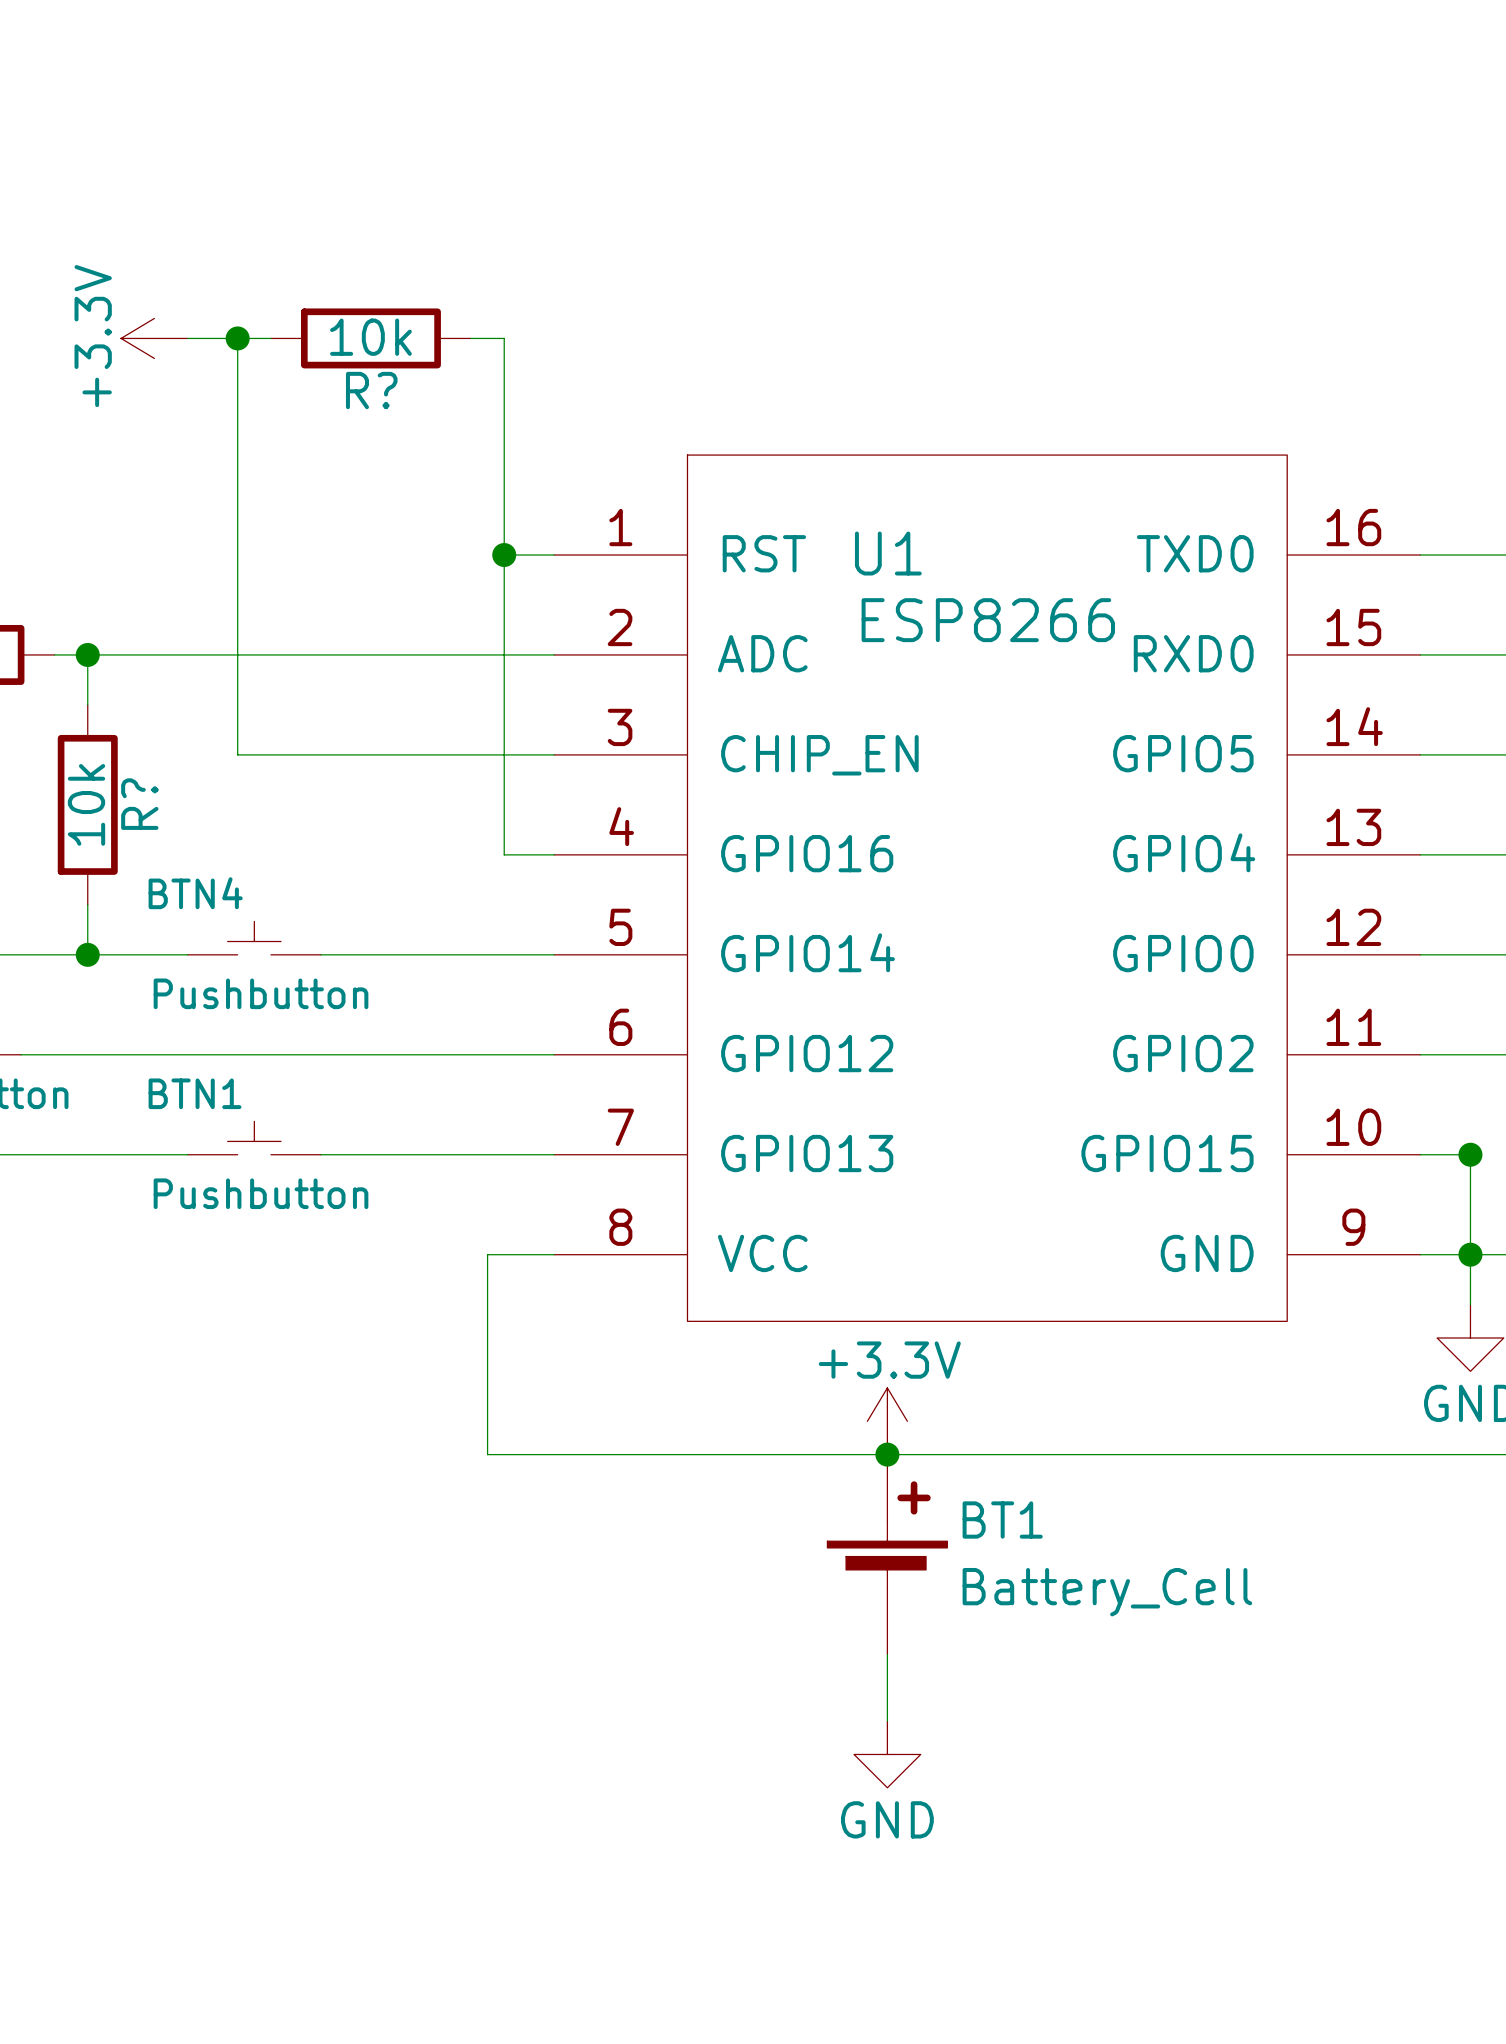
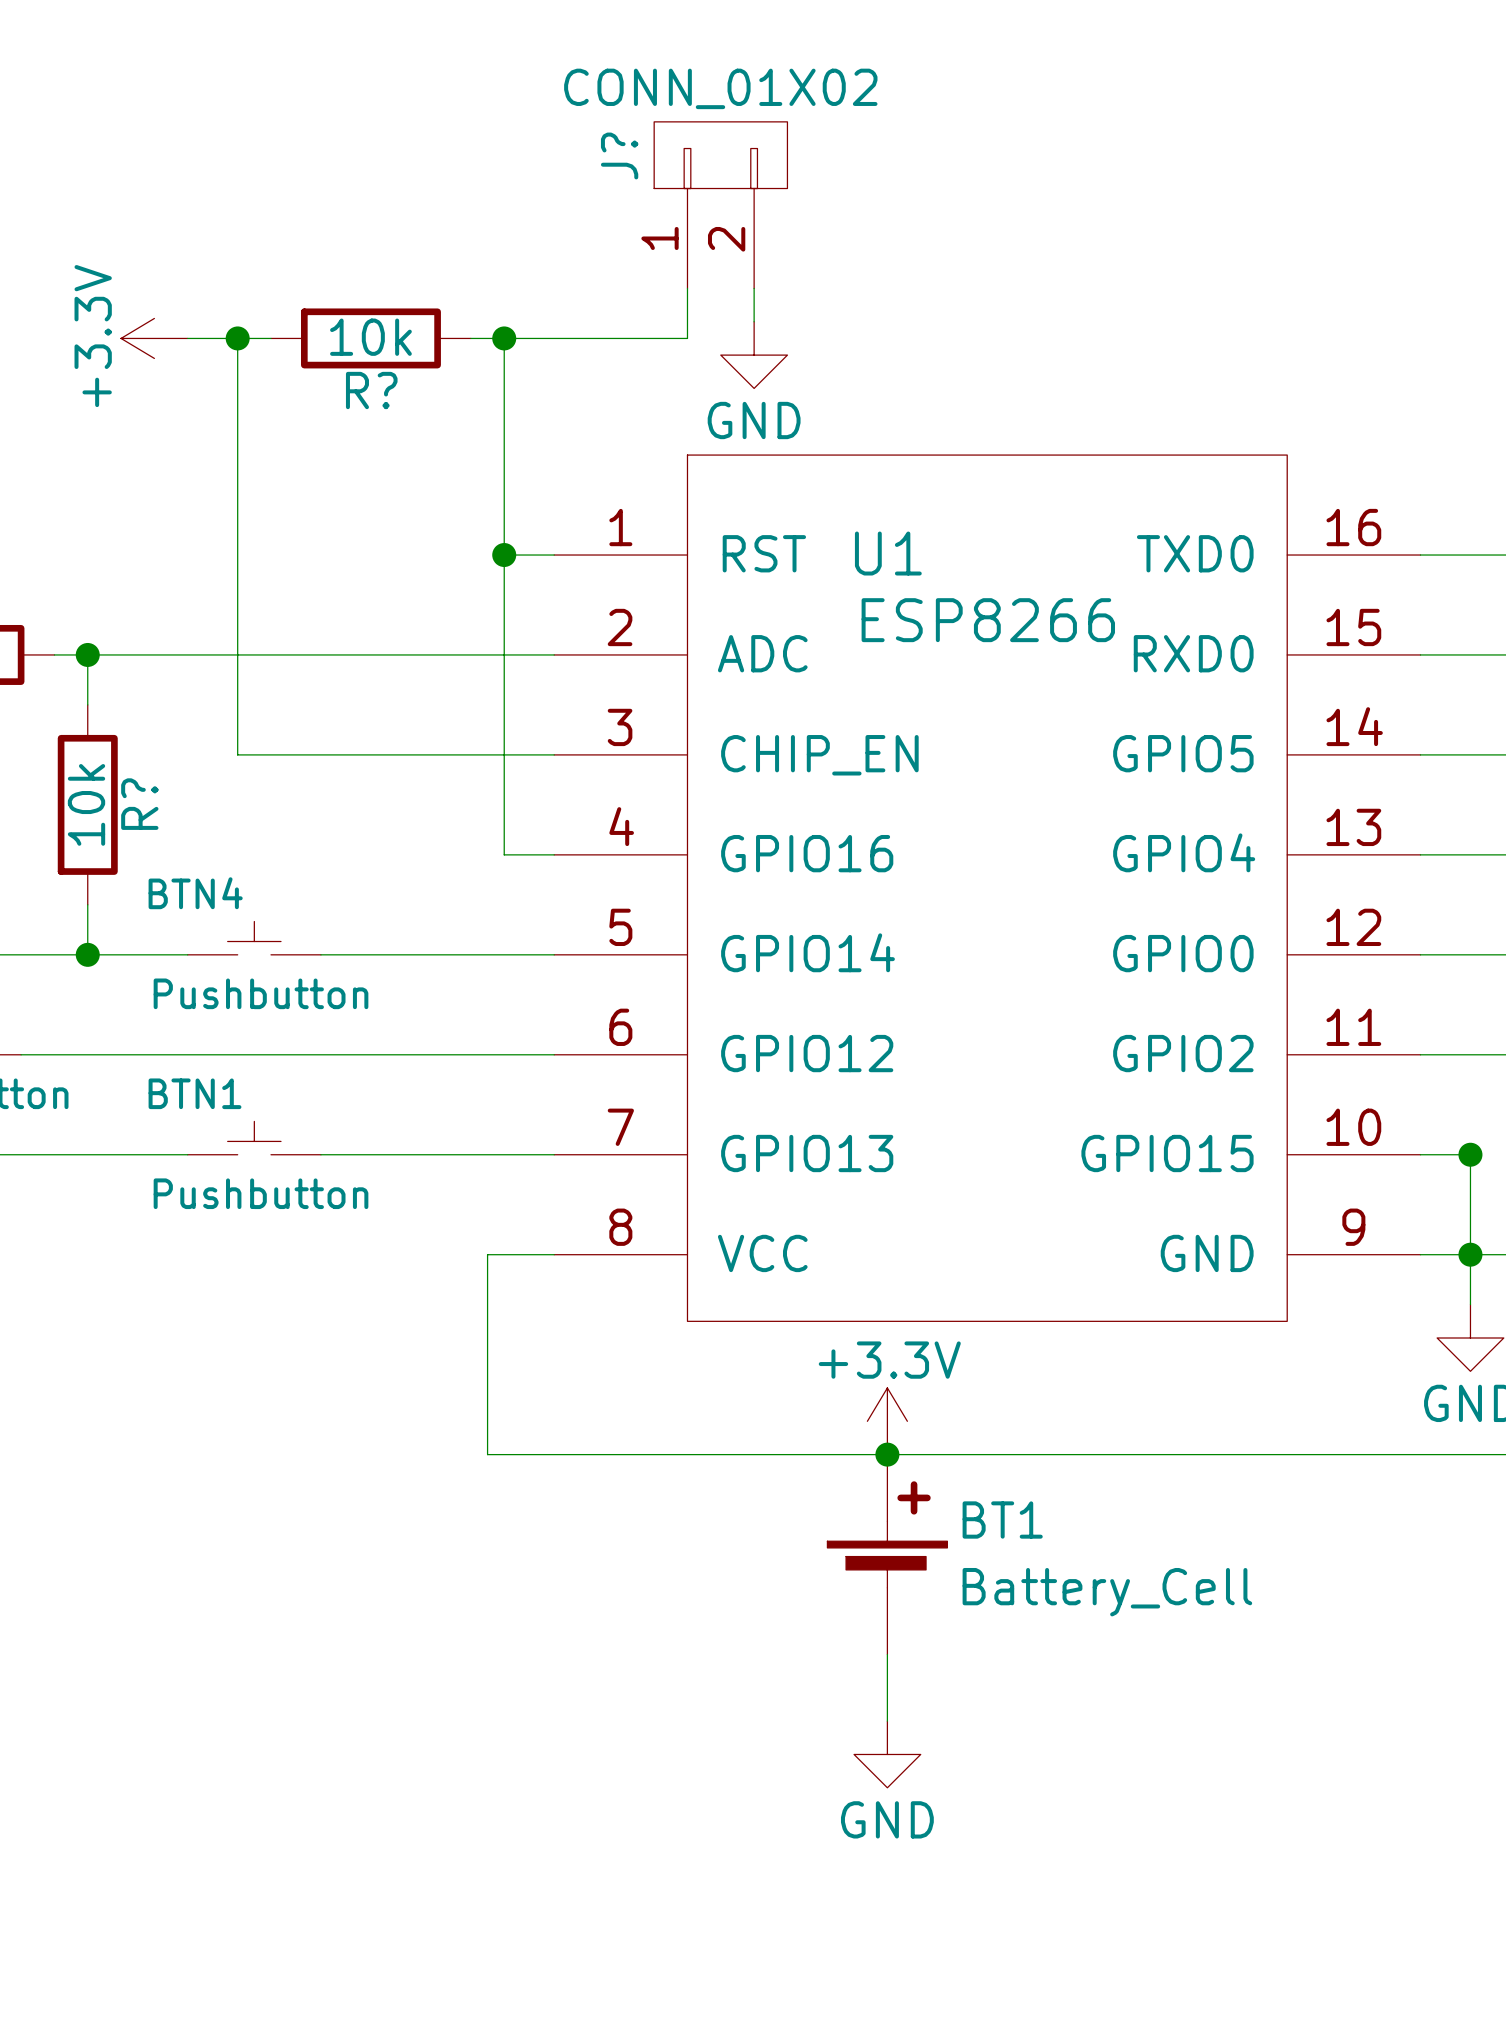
J?: none -> CONN_01X02 (720, 205)
wire: none -> (687, 288) (687, 338) (504, 338)
wire: none -> (754, 288) (754, 321)
junction: none -> (504, 338)
power symbol: none -> GND (754, 355)

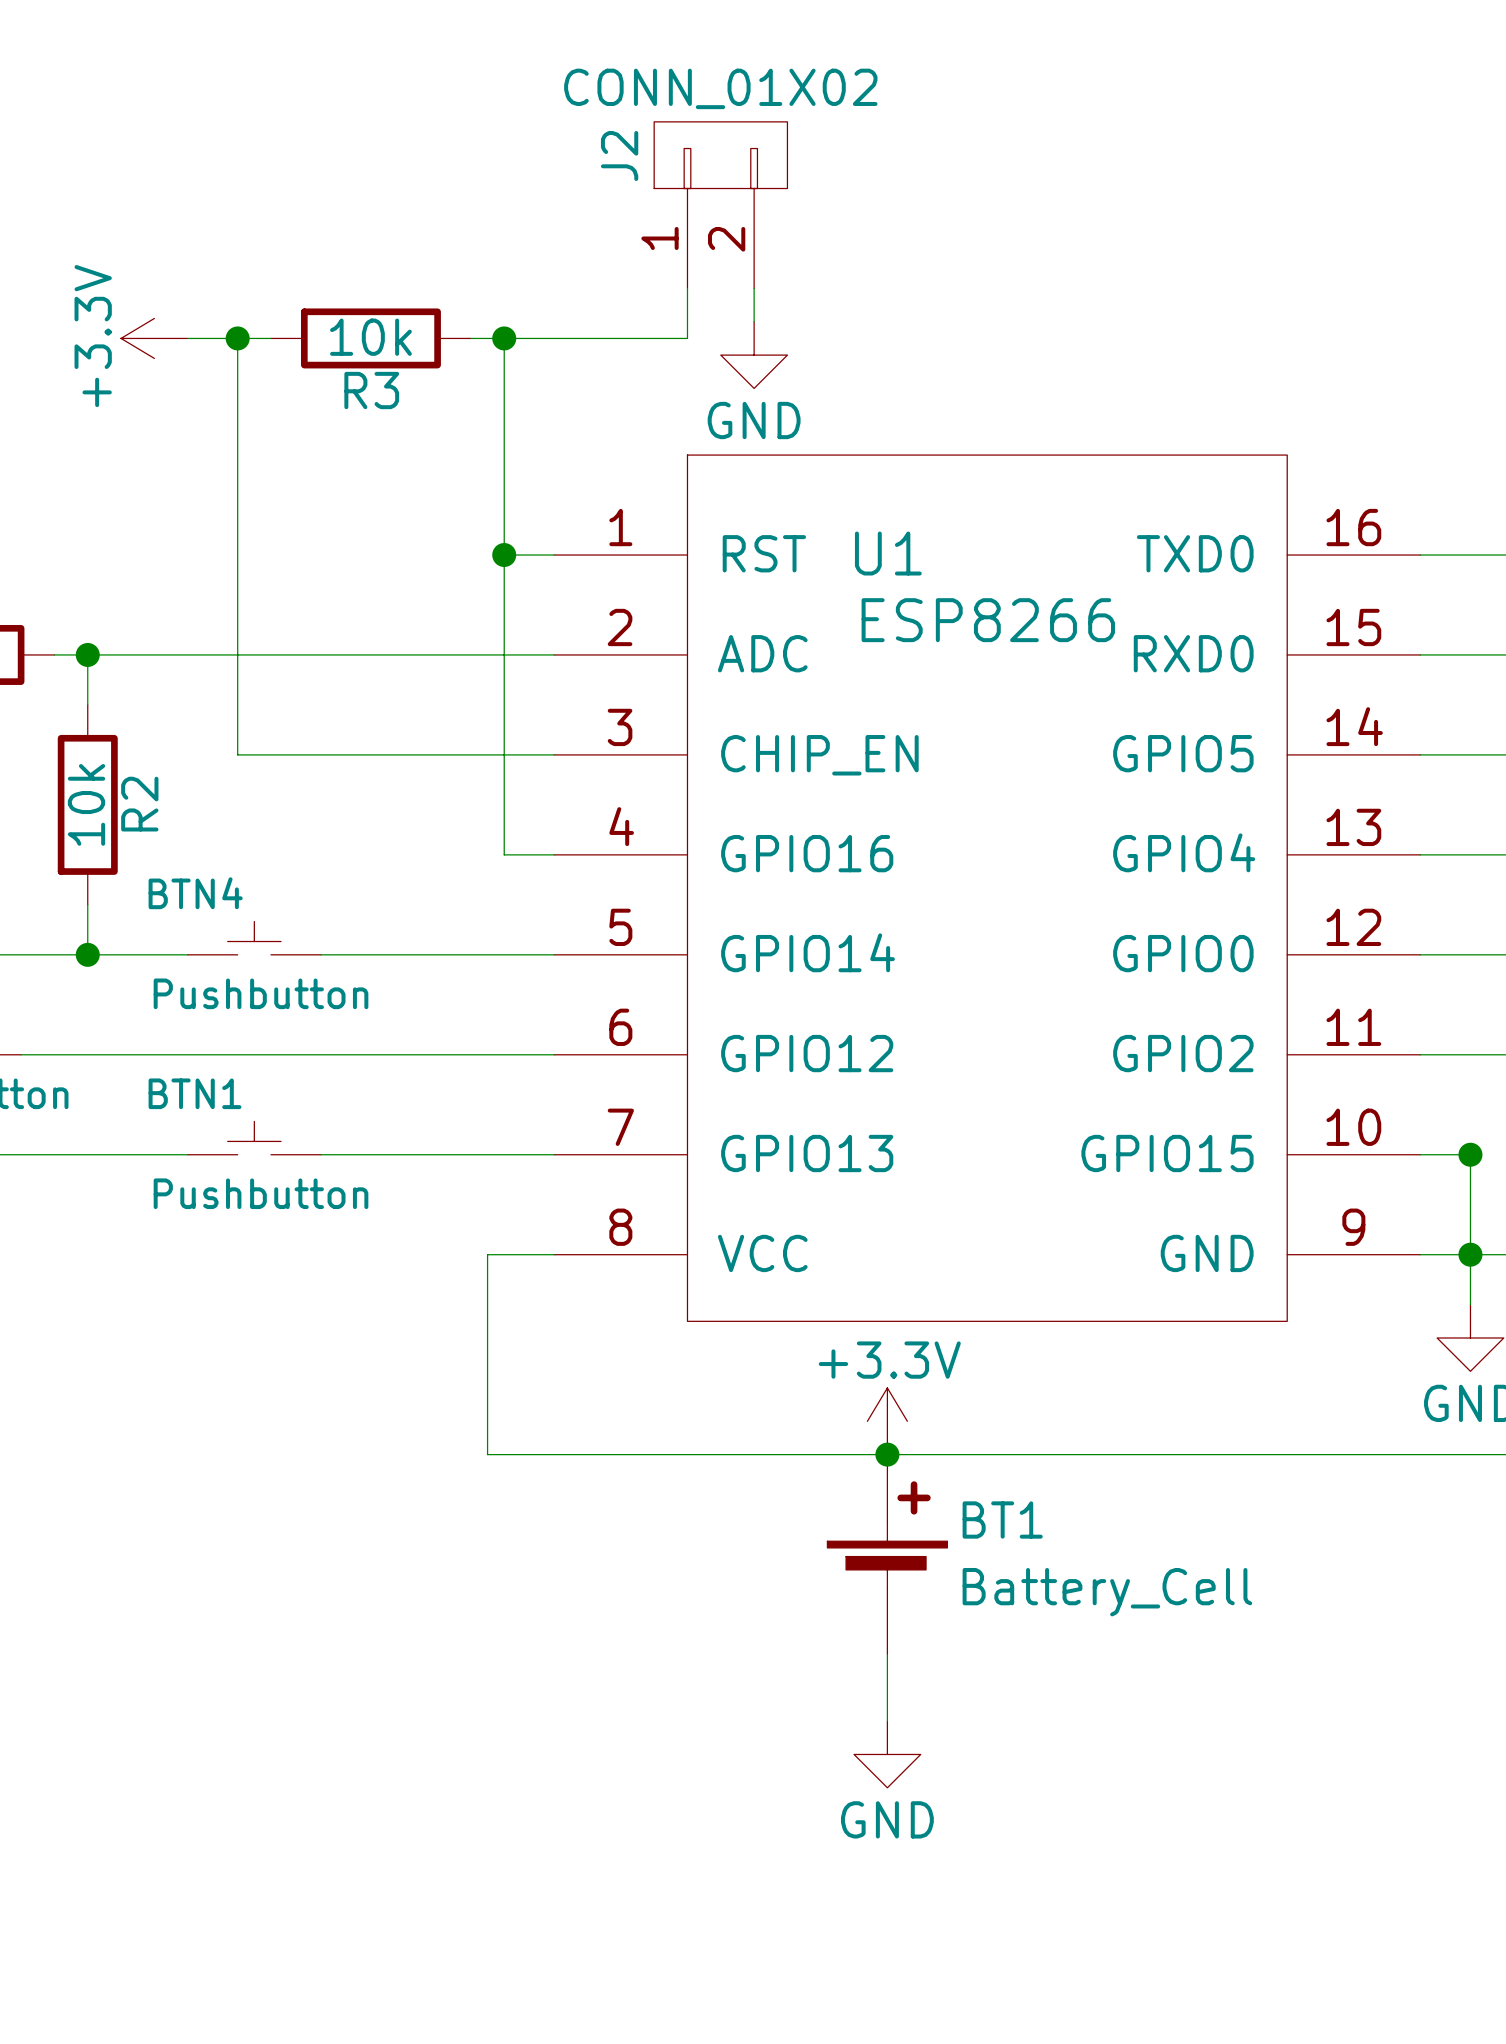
J? name: J? (619, 155) -> J2 (619, 155)
R? name: R? (371, 390) -> R3 (371, 390)
R? name: R? (139, 804) -> R2 (139, 804)

